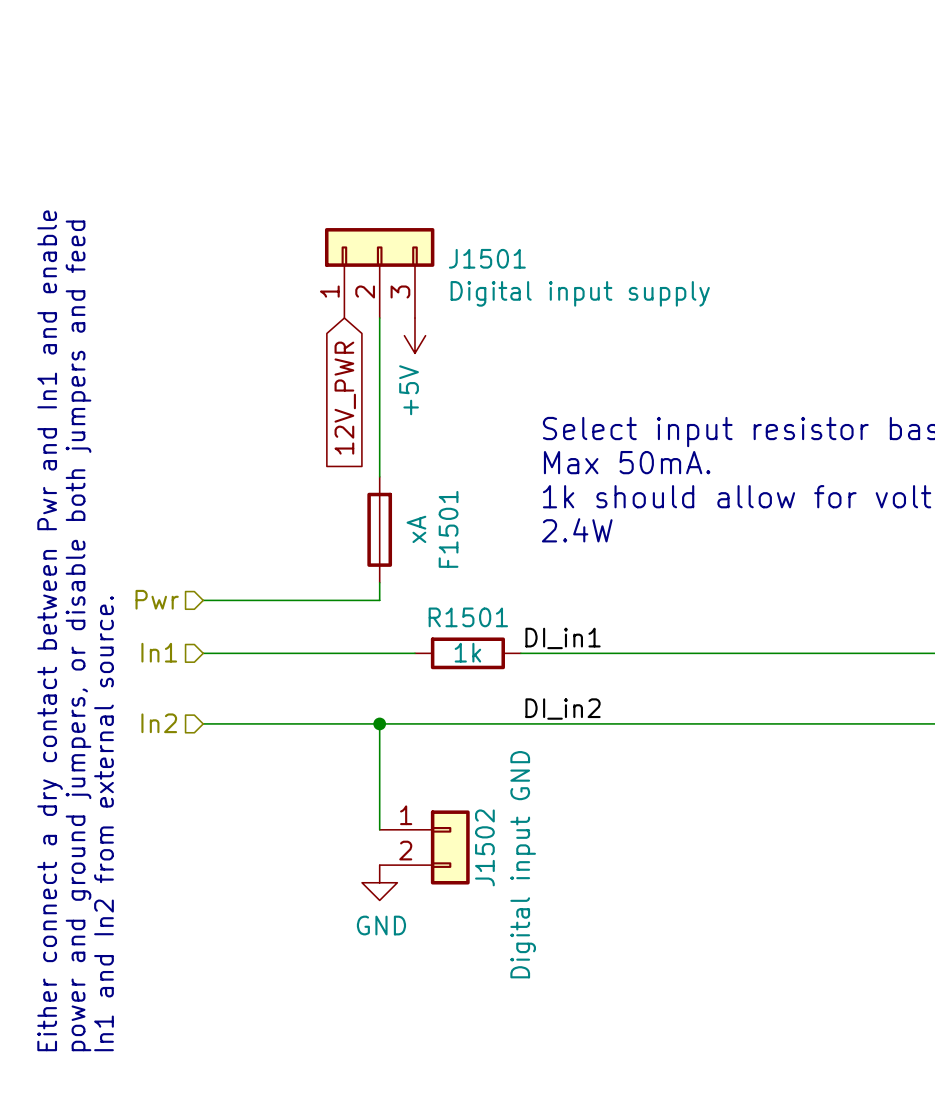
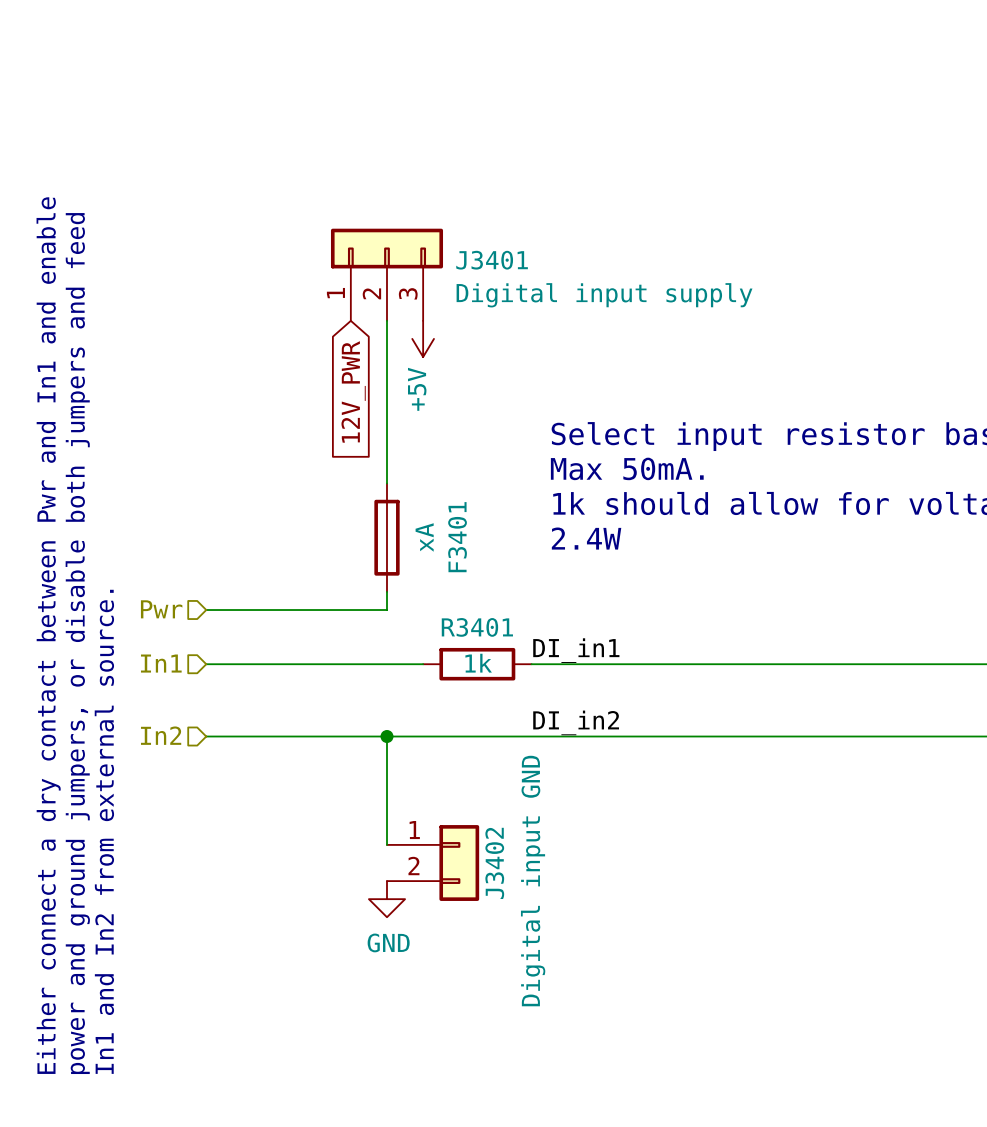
J1501 name: J1501 (487, 258) -> J3401 (492, 260)
F1501 name: F1501 (448, 529) -> F3401 (457, 537)
R1501 name: R1501 (468, 617) -> R3401 (477, 627)
J1502 name: J1502 (484, 847) -> J3402 (494, 863)

